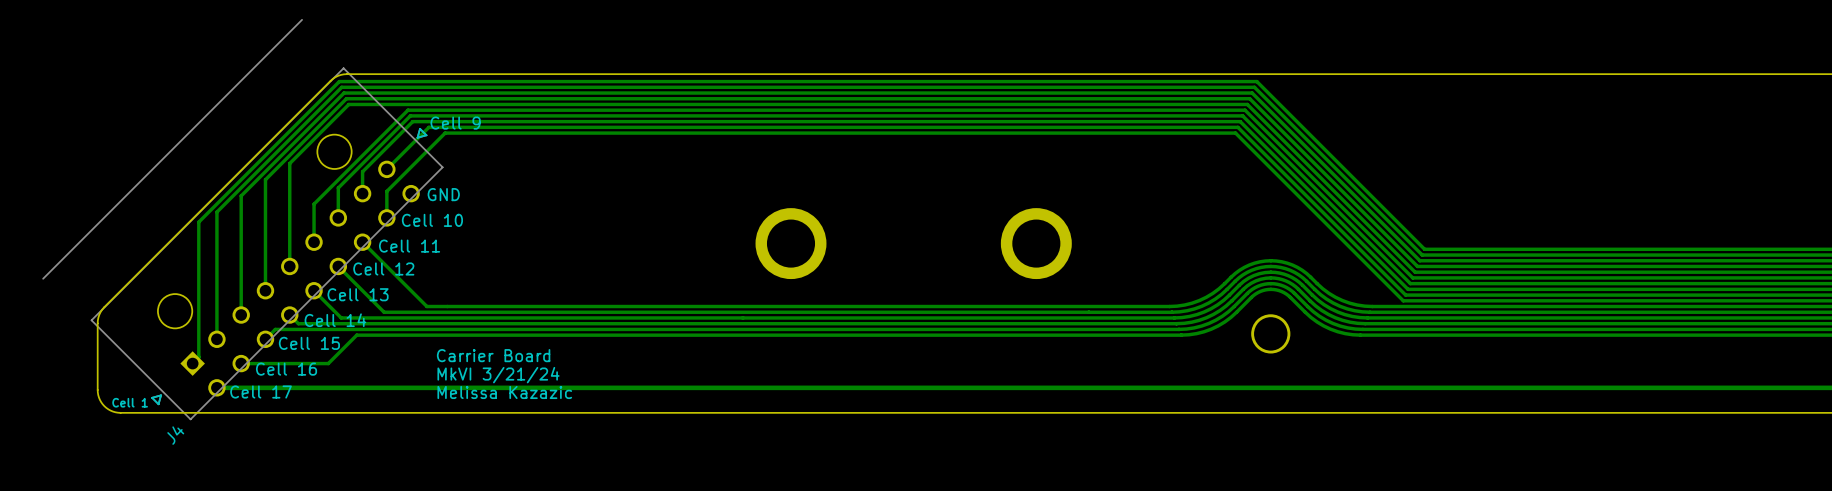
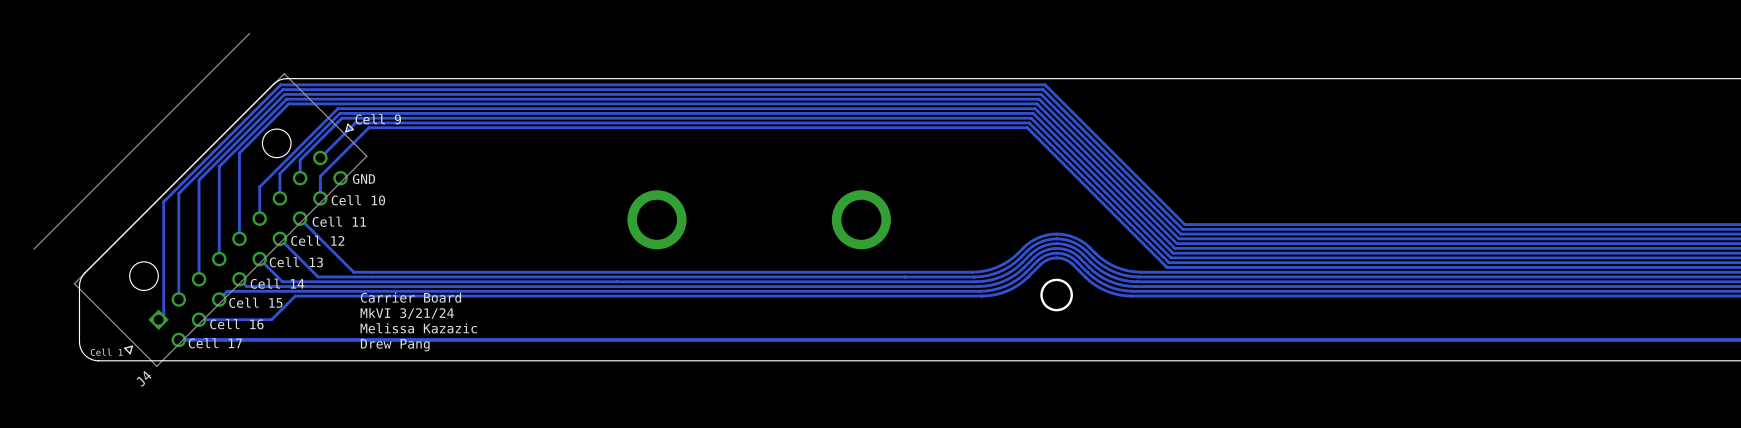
text: none -> Carrier Board (410, 297)
text: Carrier Board (493, 355) -> MkVI 3/21/24 (407, 313)
text: MkVI 3/21/24 (498, 375) -> Melissa Kazazic (418, 328)
text: Melissa Kazazic (504, 392) -> Drew Pang (395, 345)

